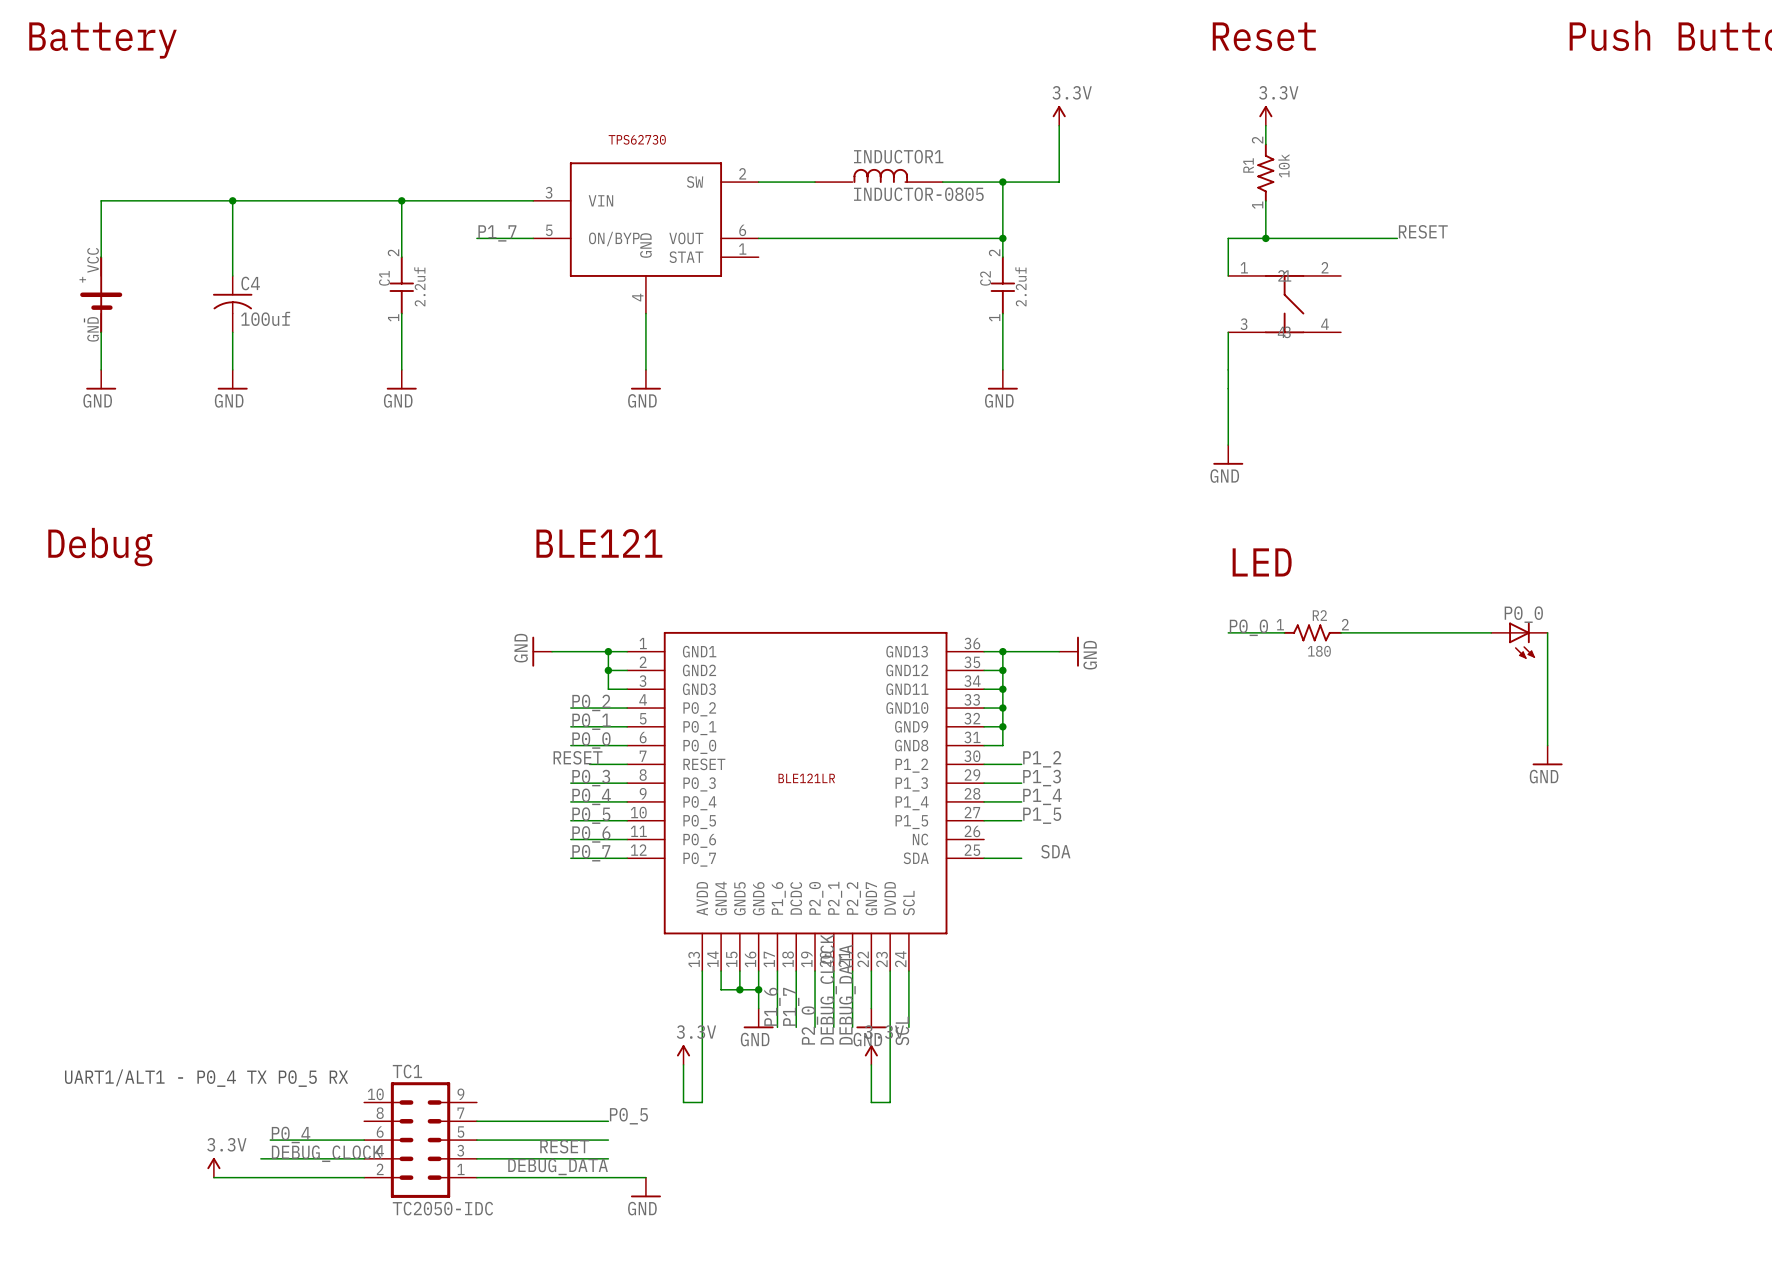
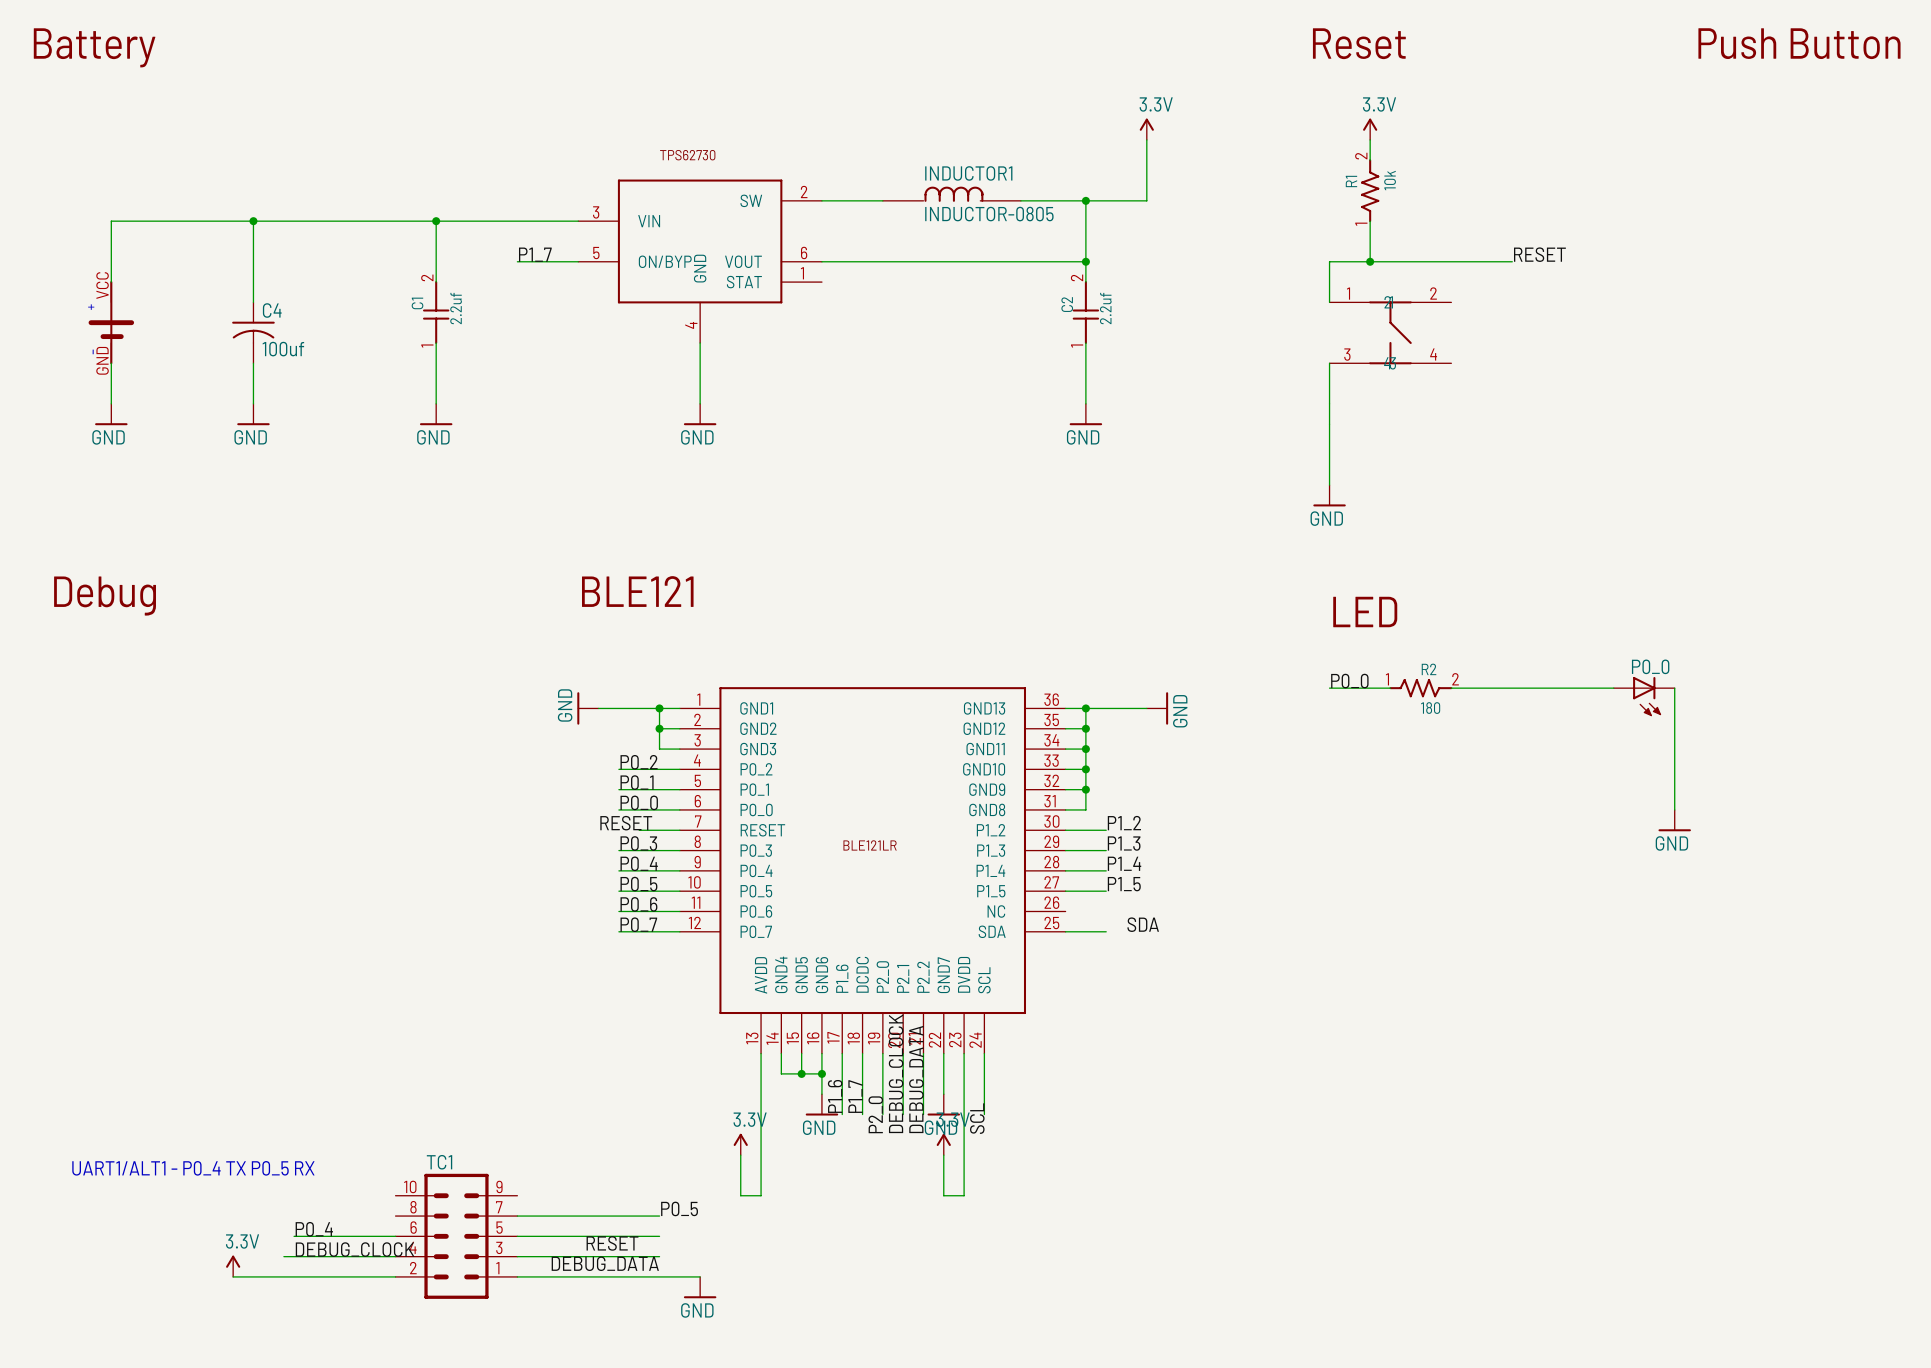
TC1 value: TC2050-IDC (442, 1208) -> none

